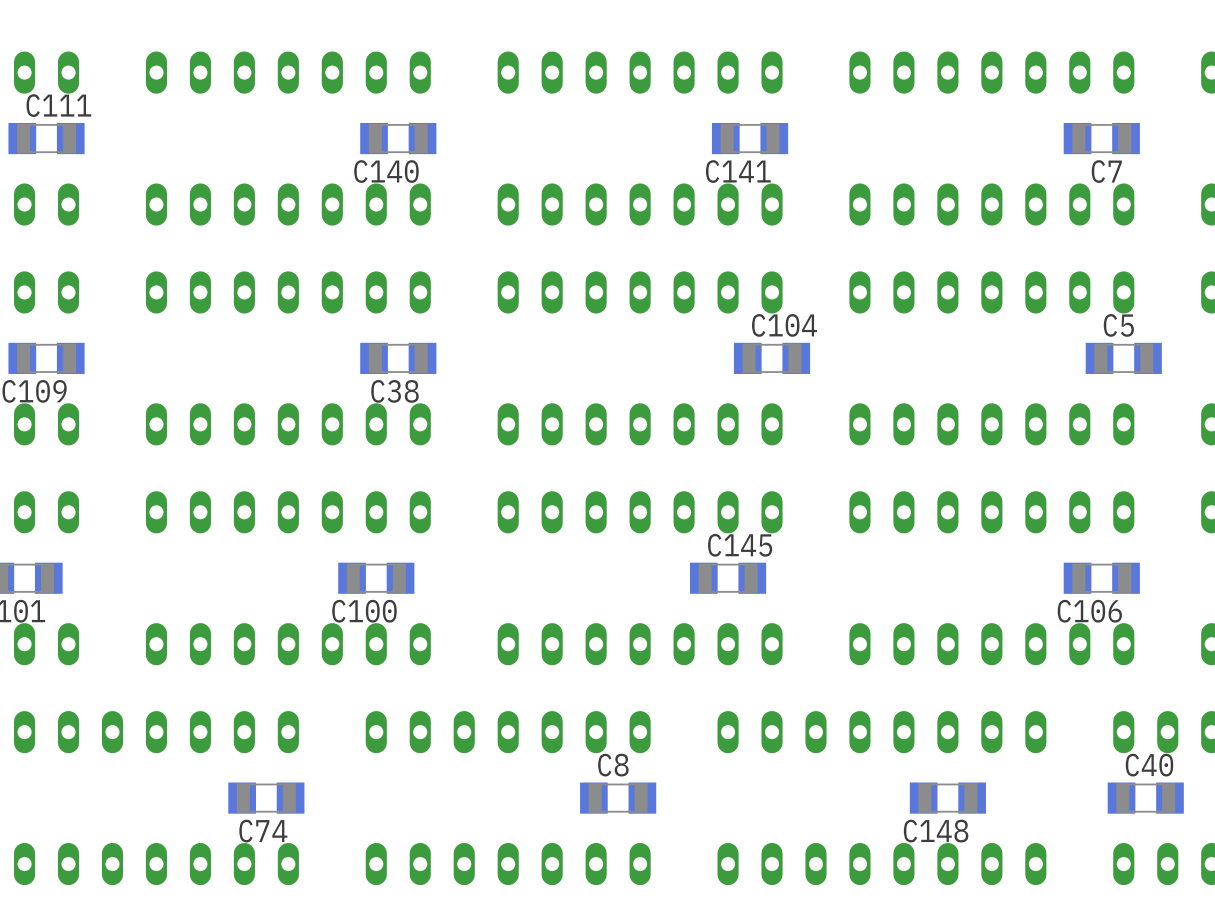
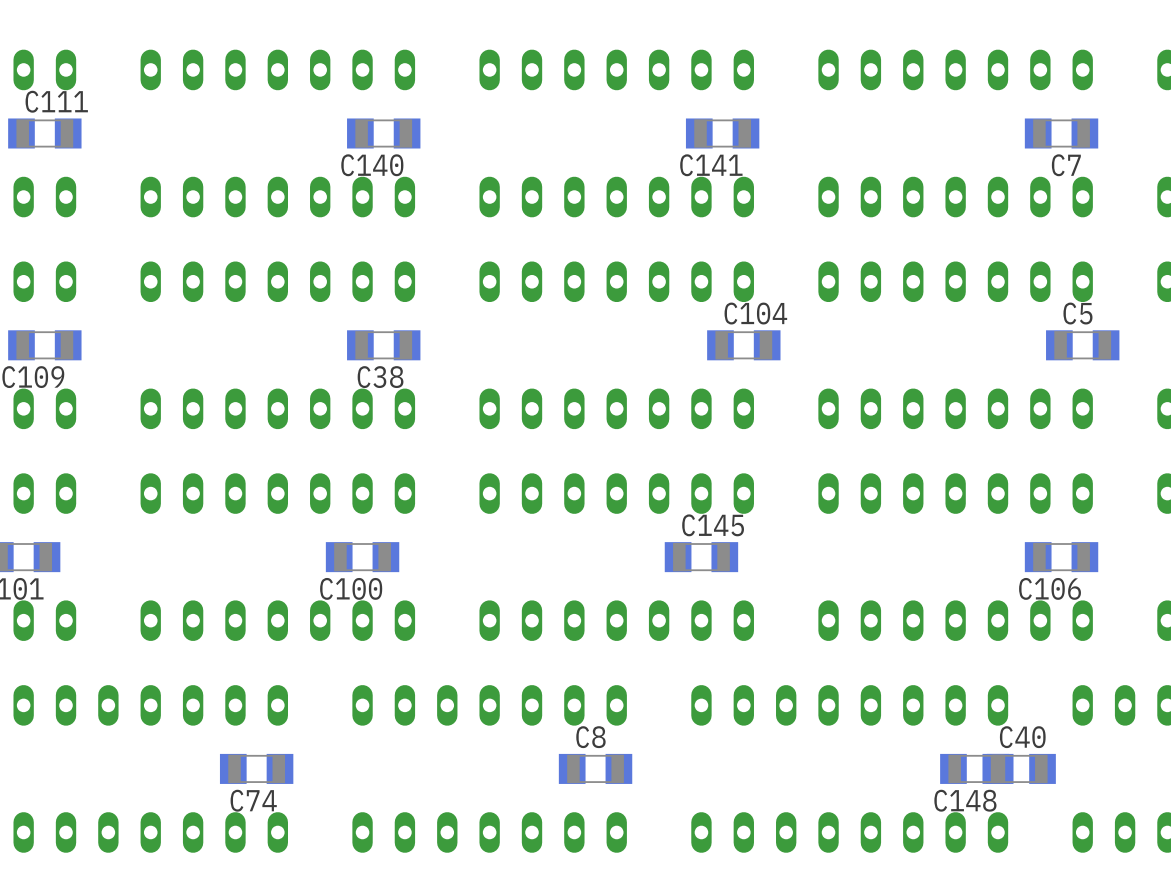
C148 position: (947, 798) -> (976, 768)
C40 position: (1145, 798) -> (1019, 768)

